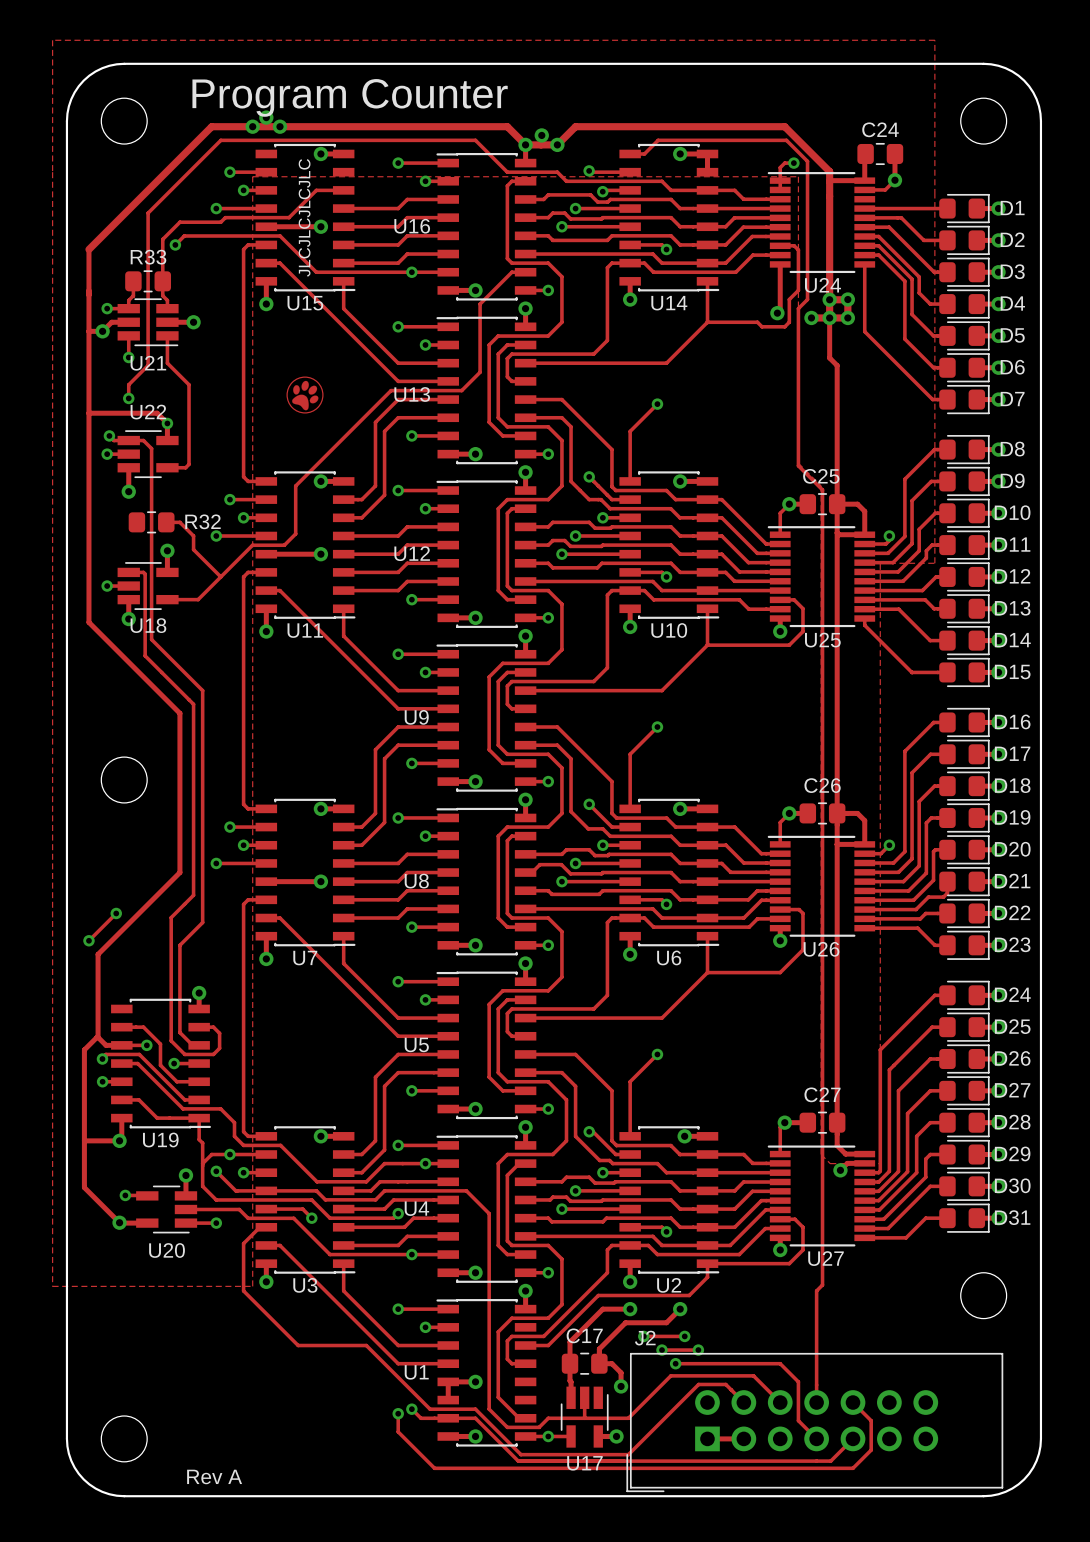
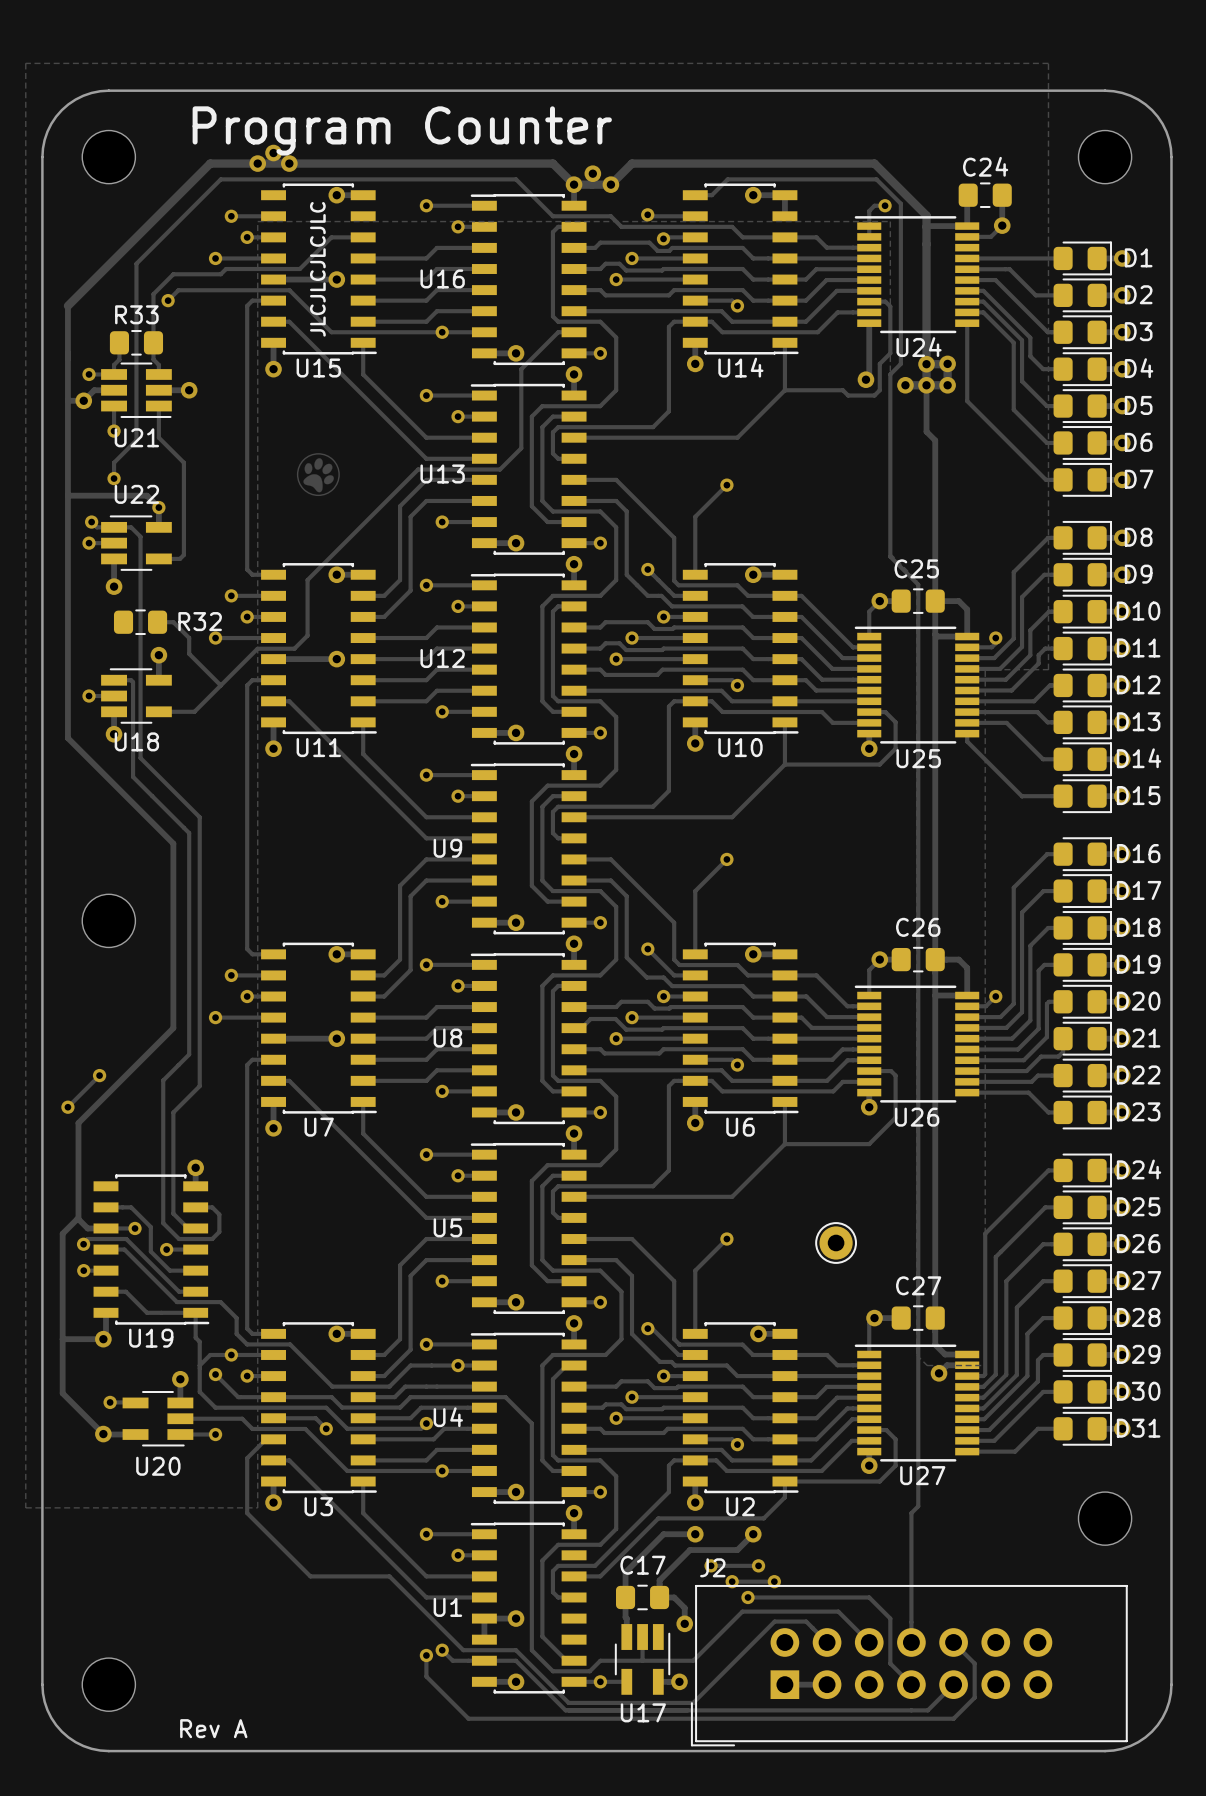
part: none -> (836, 1242)

